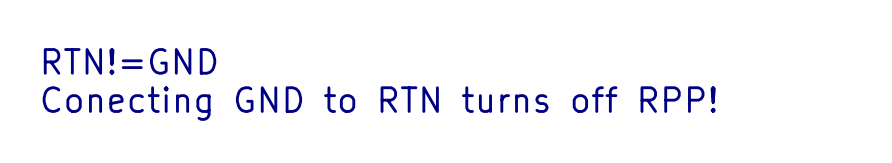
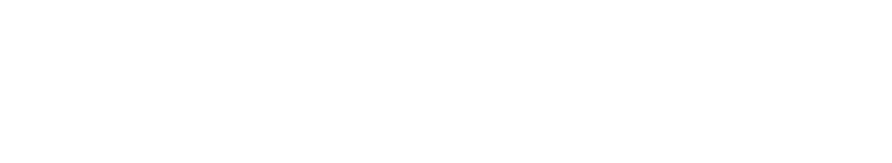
text: RTN!=GND (130, 61) -> none
text: Conecting GND to RTN turns off RPP! (379, 103) -> none

